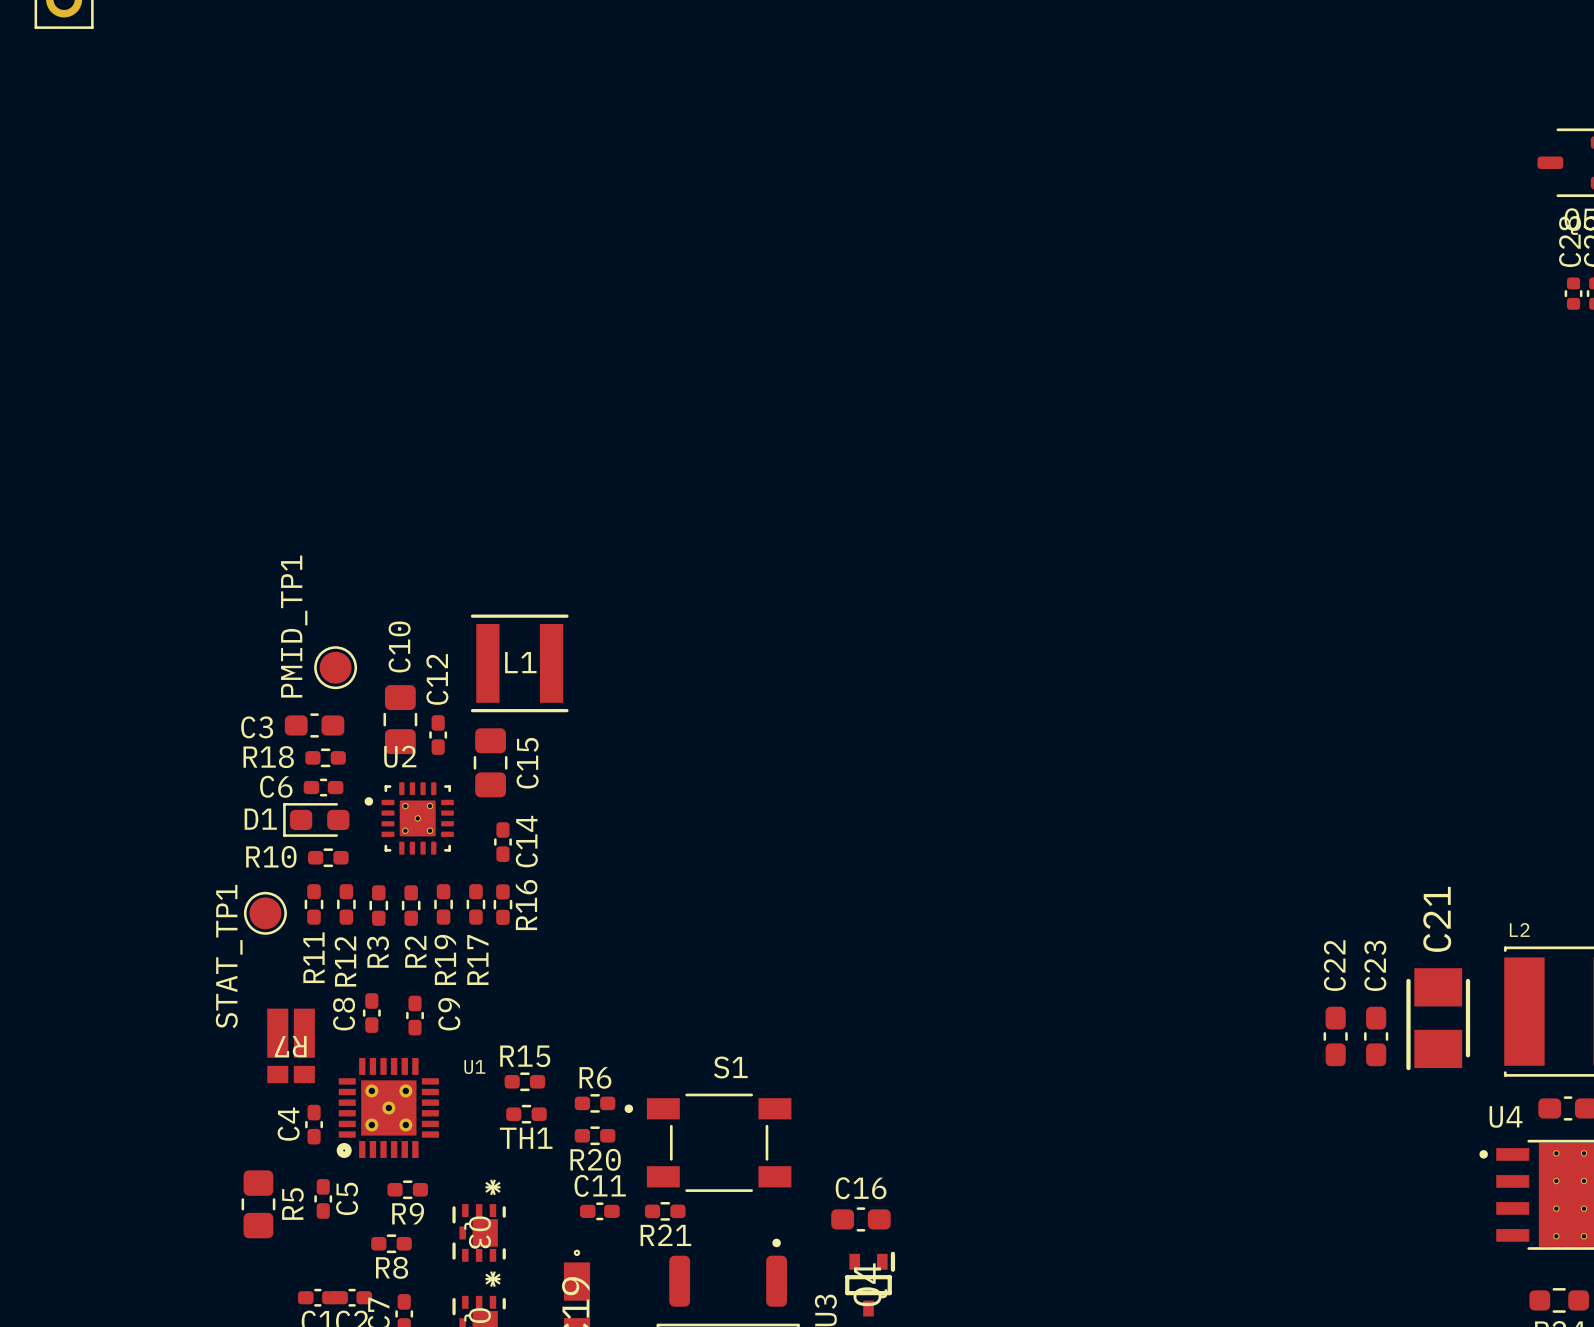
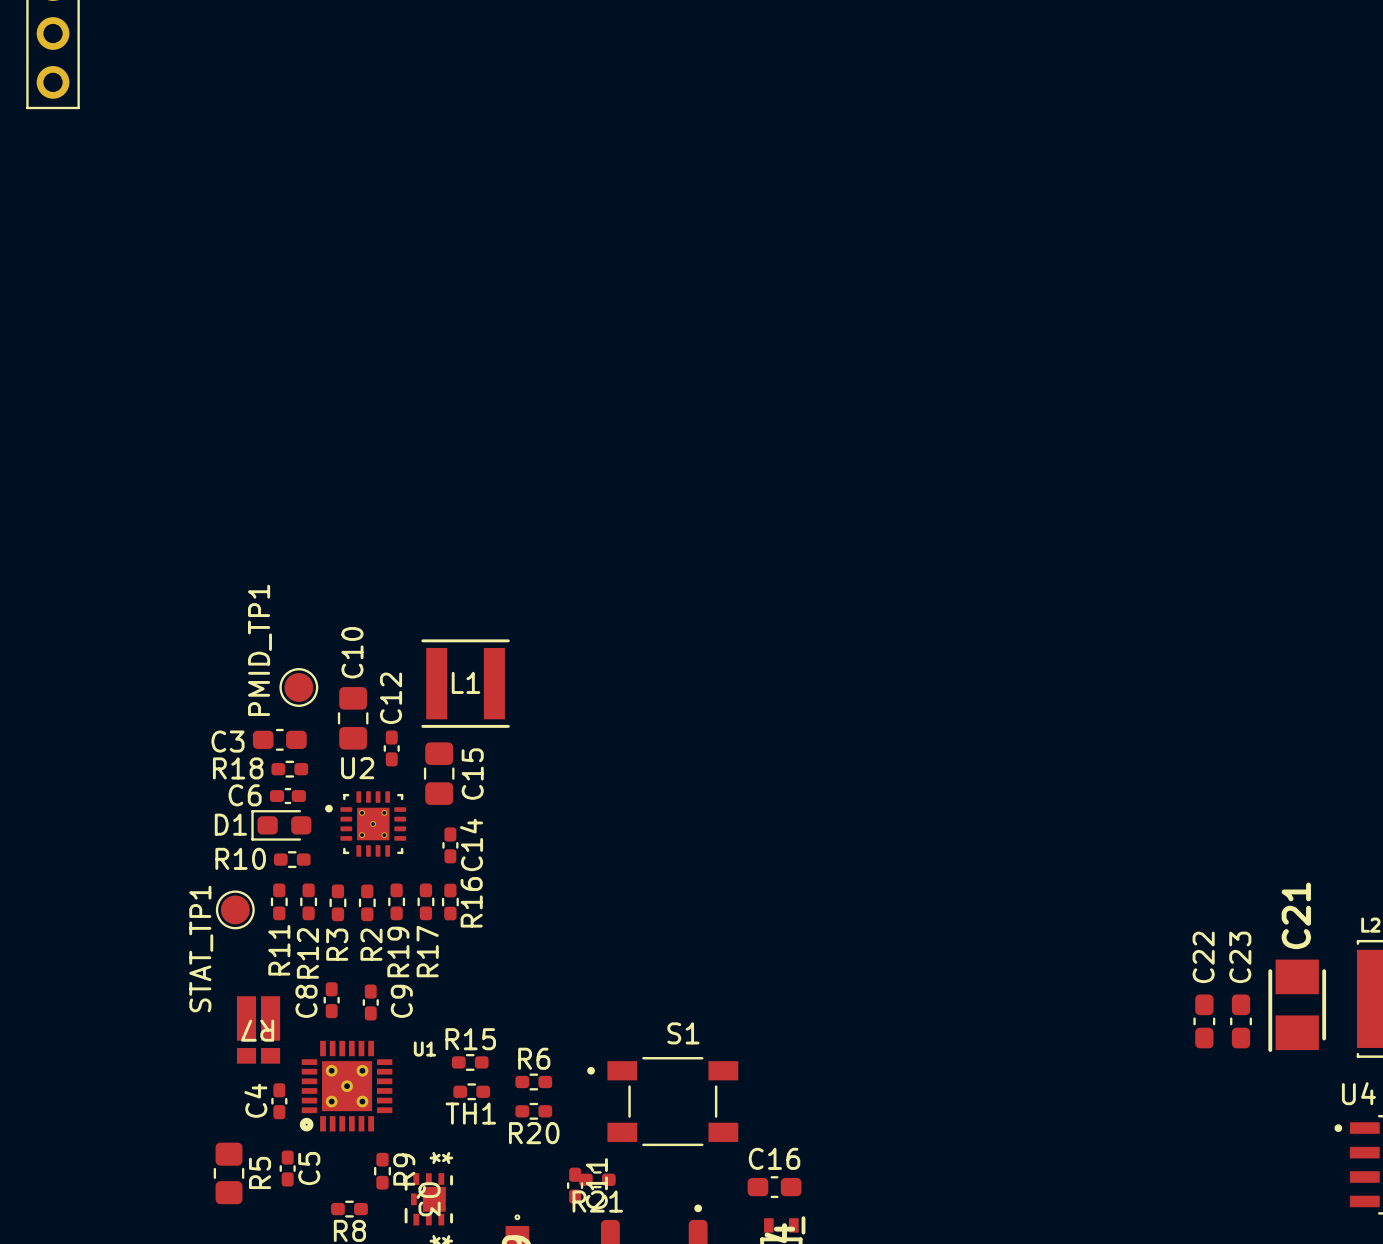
C10 position: (400, 719) -> (353, 718)
S1 position: (707, 1142) -> (662, 1101)
R9 rotation: 0° (407, 1189) -> 90° clockwise (382, 1171)
C11 rotation: 0° (599, 1211) -> 90° clockwise (575, 1185)
C11 position: (599, 1211) -> (575, 1185)

